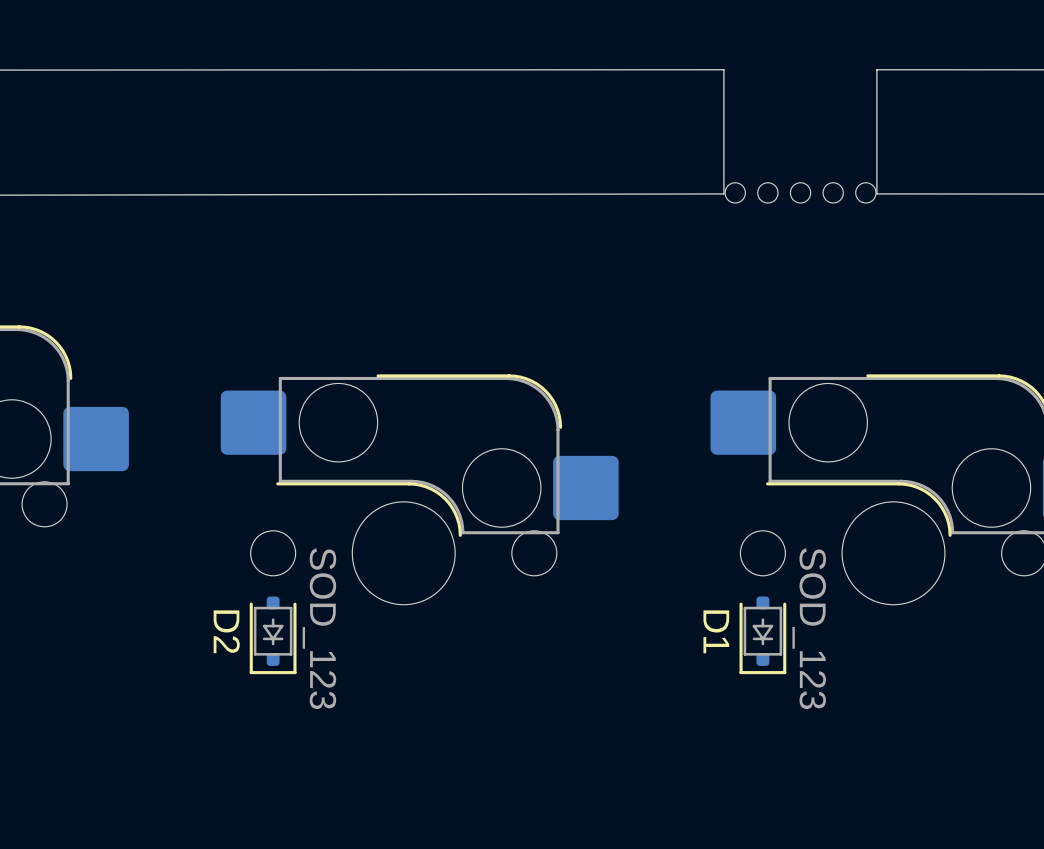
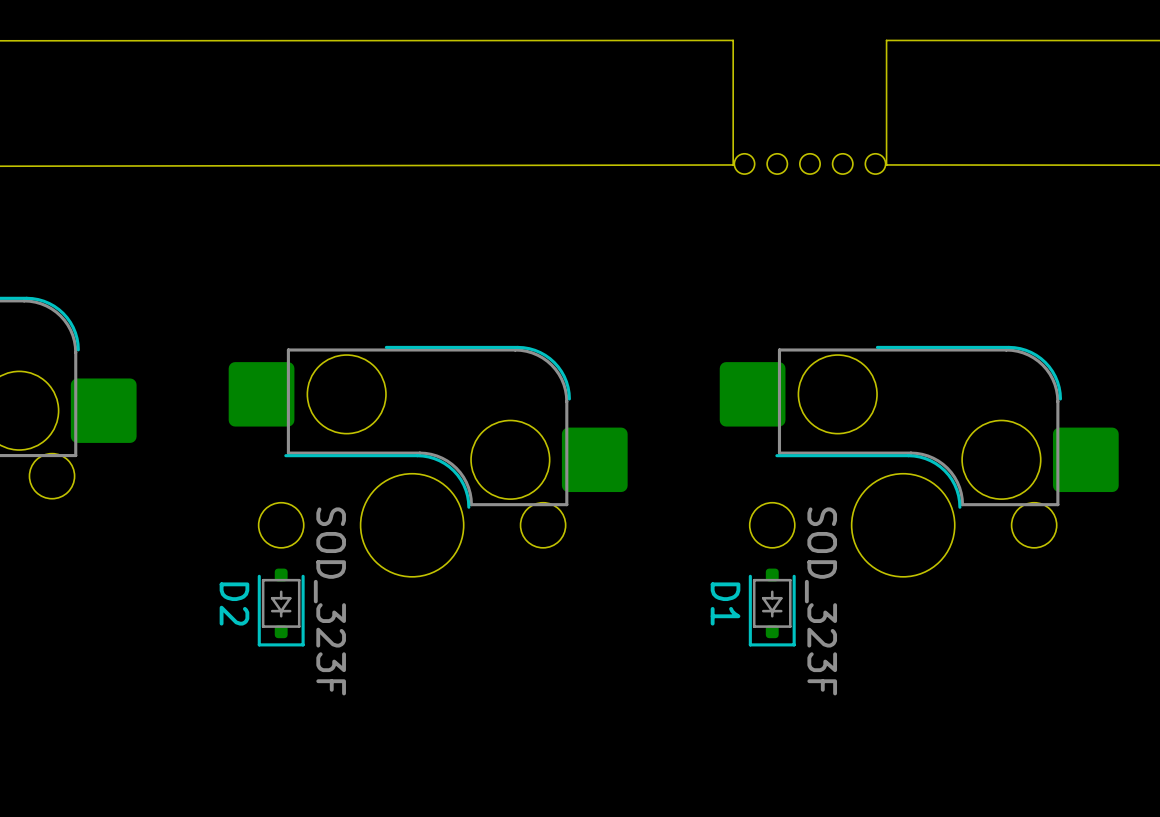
D2 value: SOD_123 (319, 628) -> SOD_323F (329, 601)
D1 value: SOD_123 (809, 628) -> SOD_323F (820, 601)

